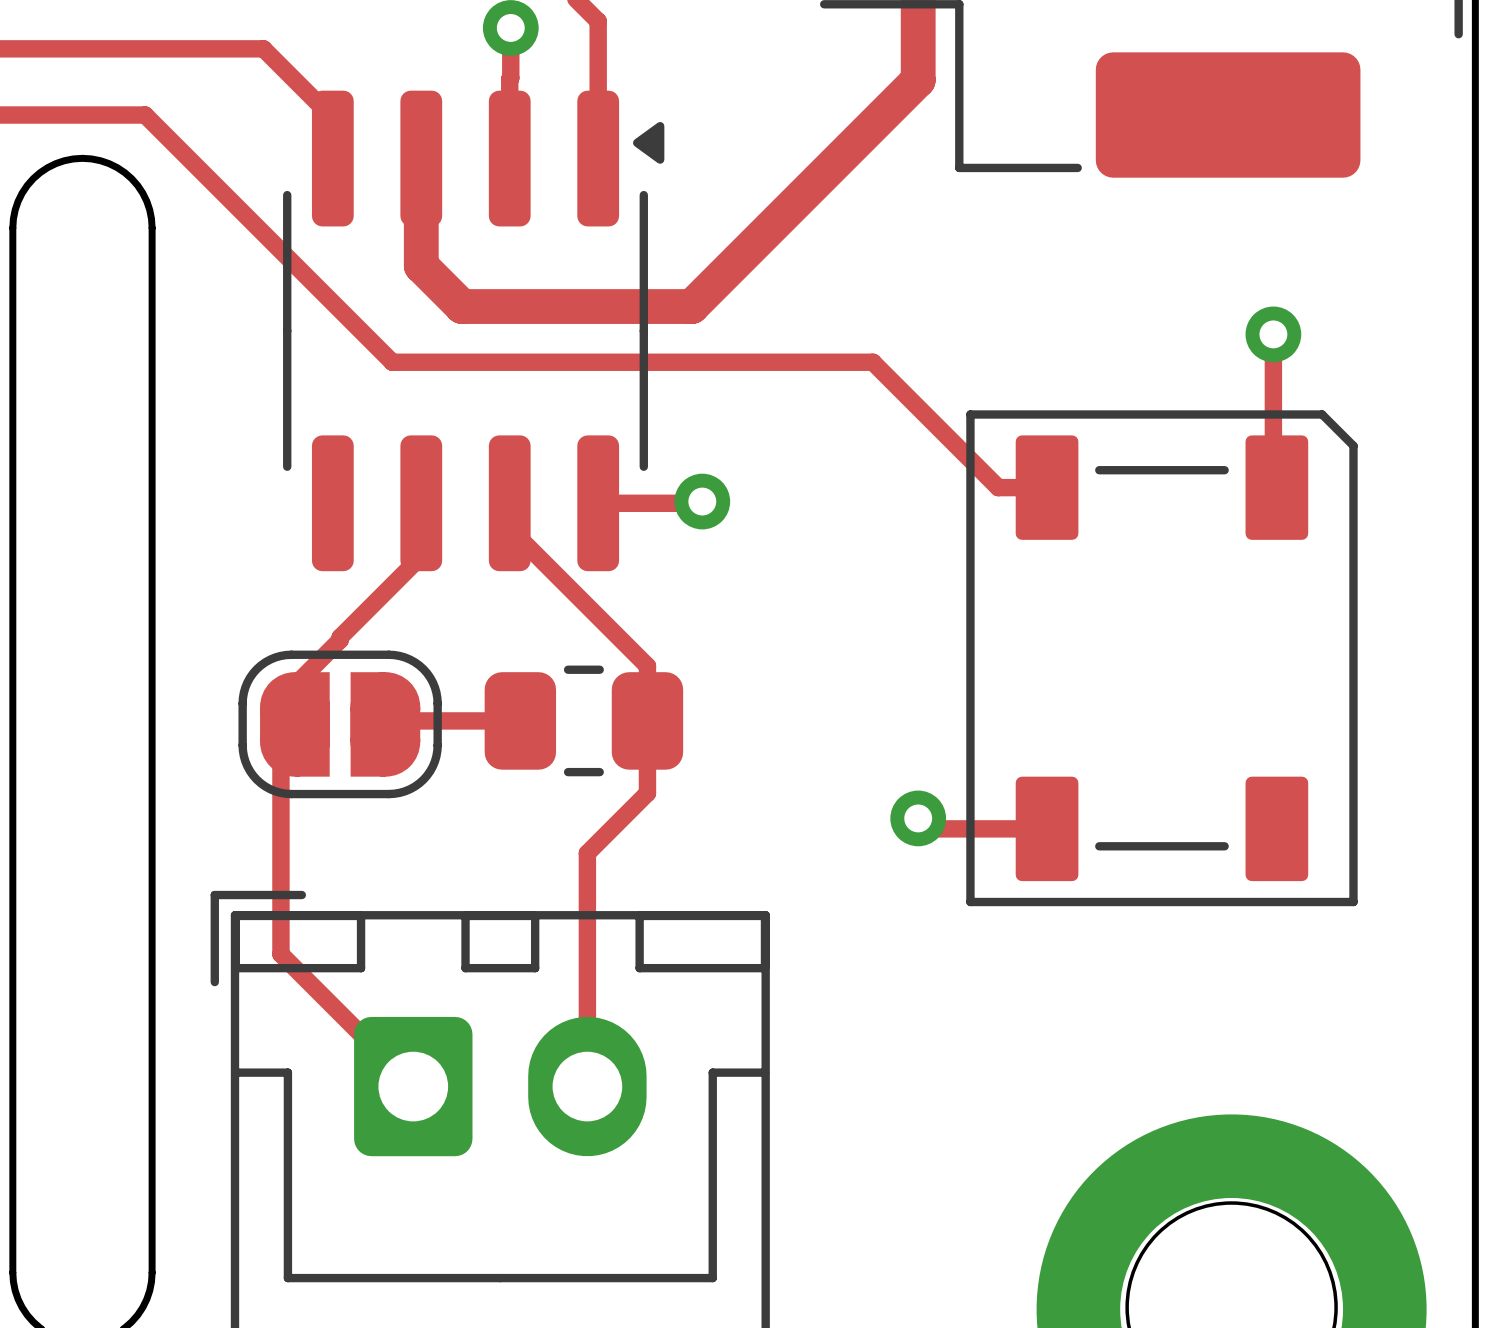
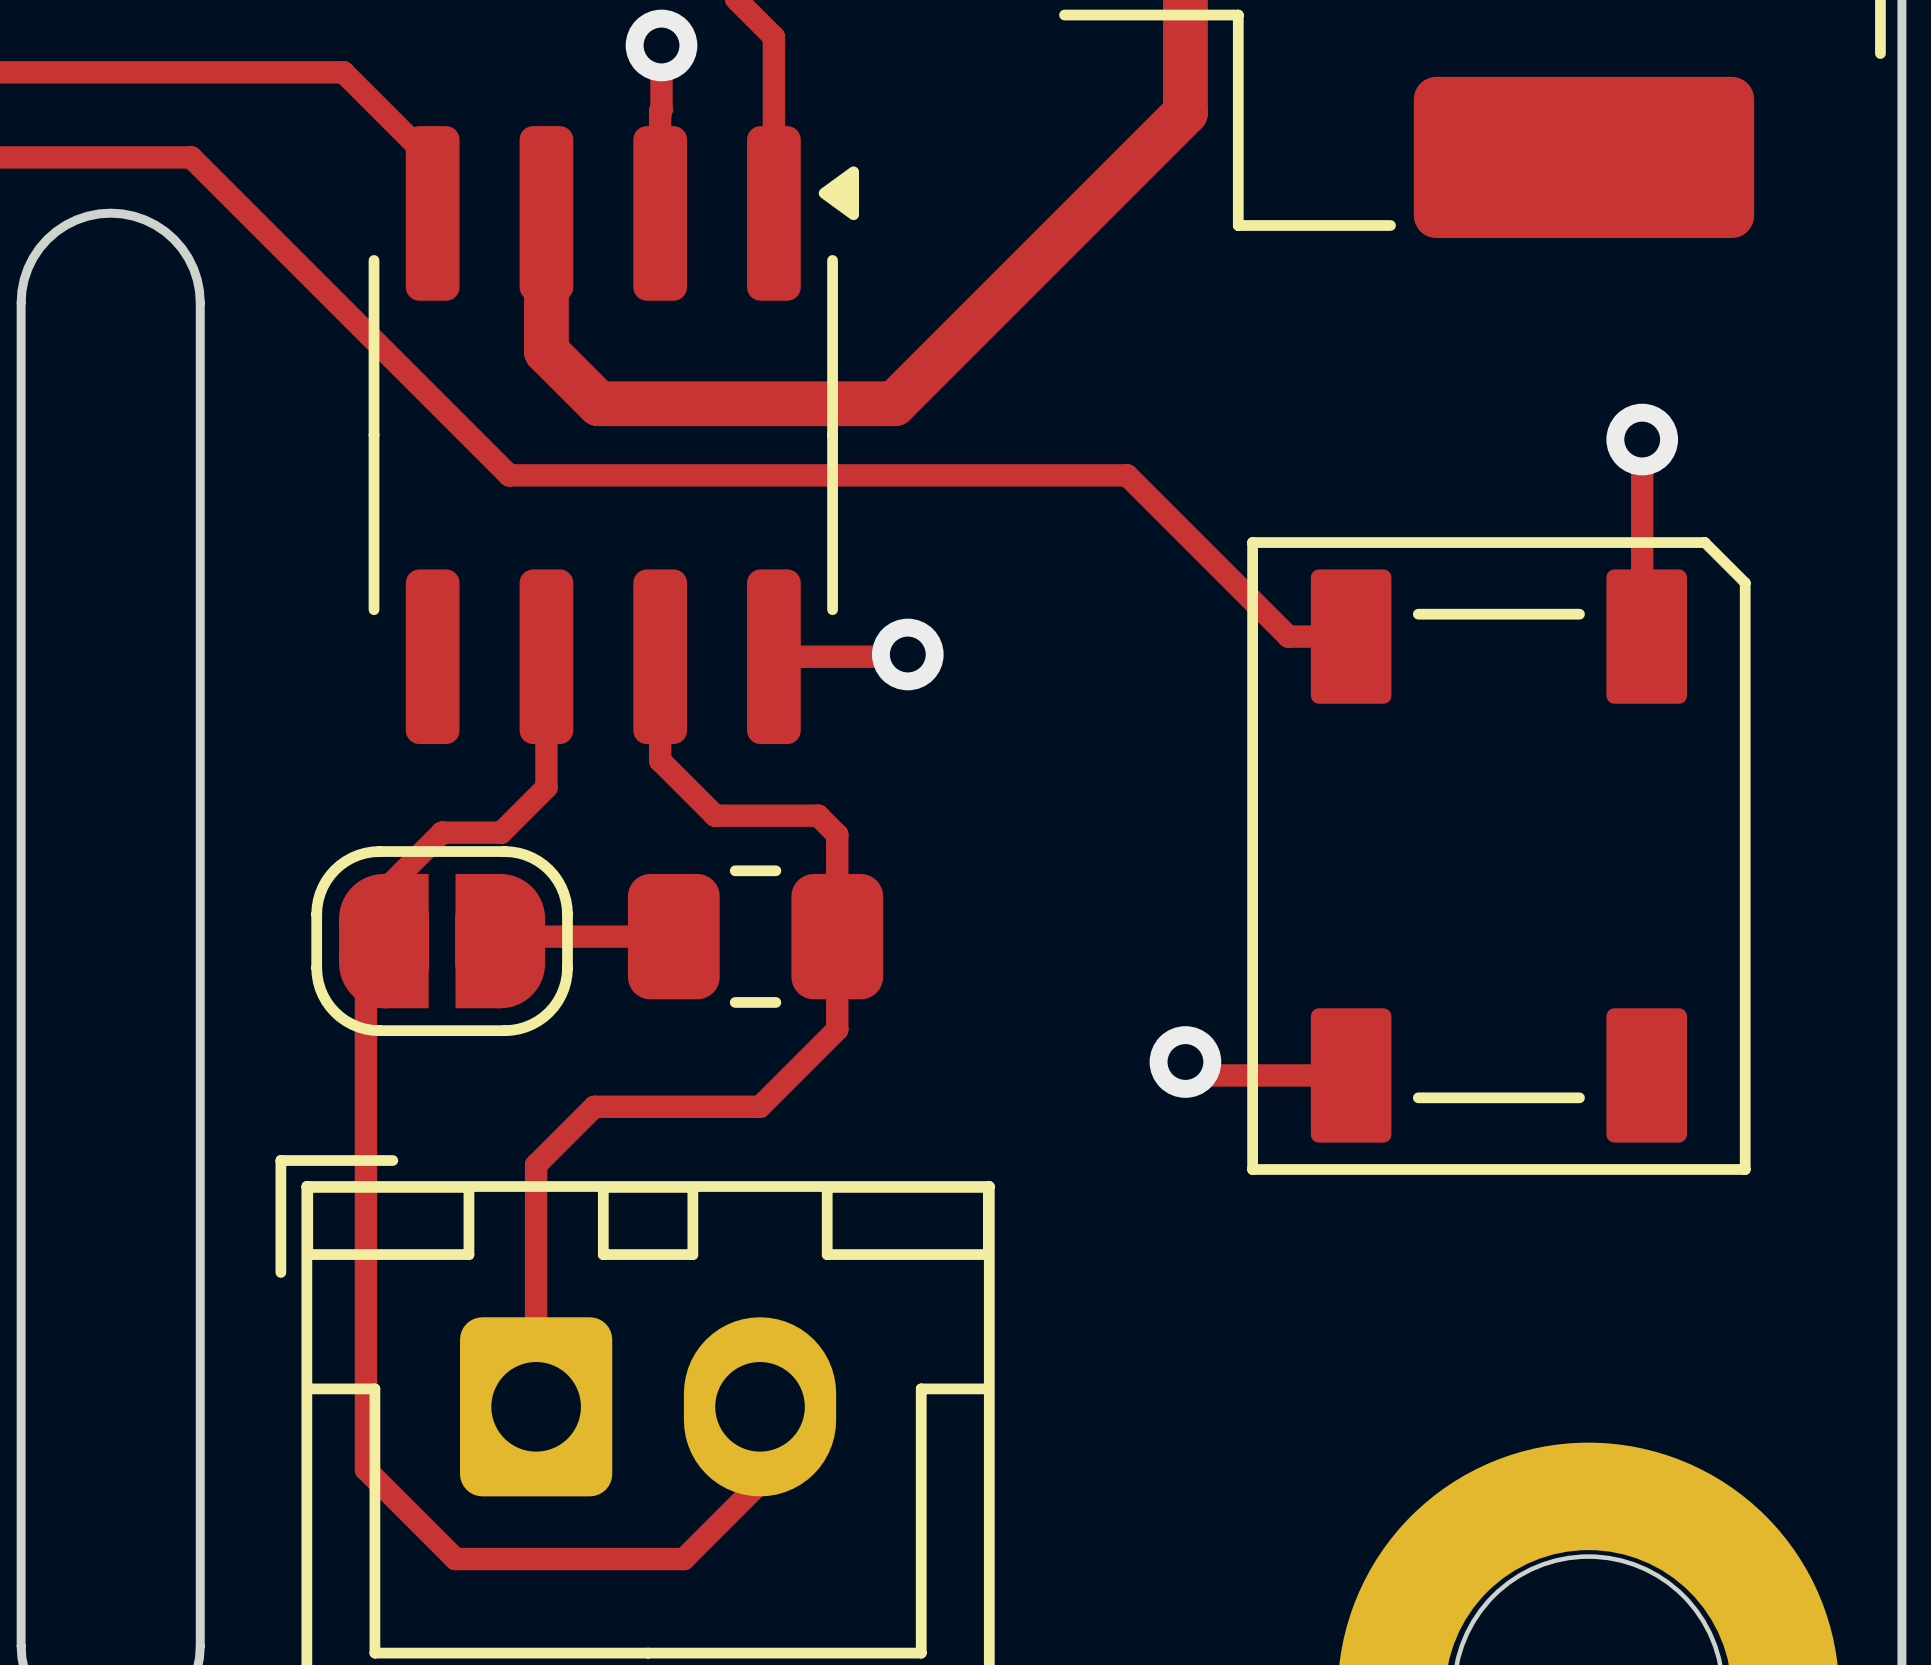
track: (509, 528) (647, 666) -> (660, 688) (660, 760) (715, 815) (818, 815) (837, 834) (837, 866)
track: (421, 556) (340, 637) (340, 640) -> (546, 724) (546, 787) (501, 832) (442, 832)
track: (587, 853) (587, 1086) -> (760, 1106) (594, 1106) (536, 1165) (536, 1406)
track: (280, 954) (413, 1086) -> (365, 1236) (365, 1469) (455, 1559) (683, 1559) (760, 1482) (760, 1406)

